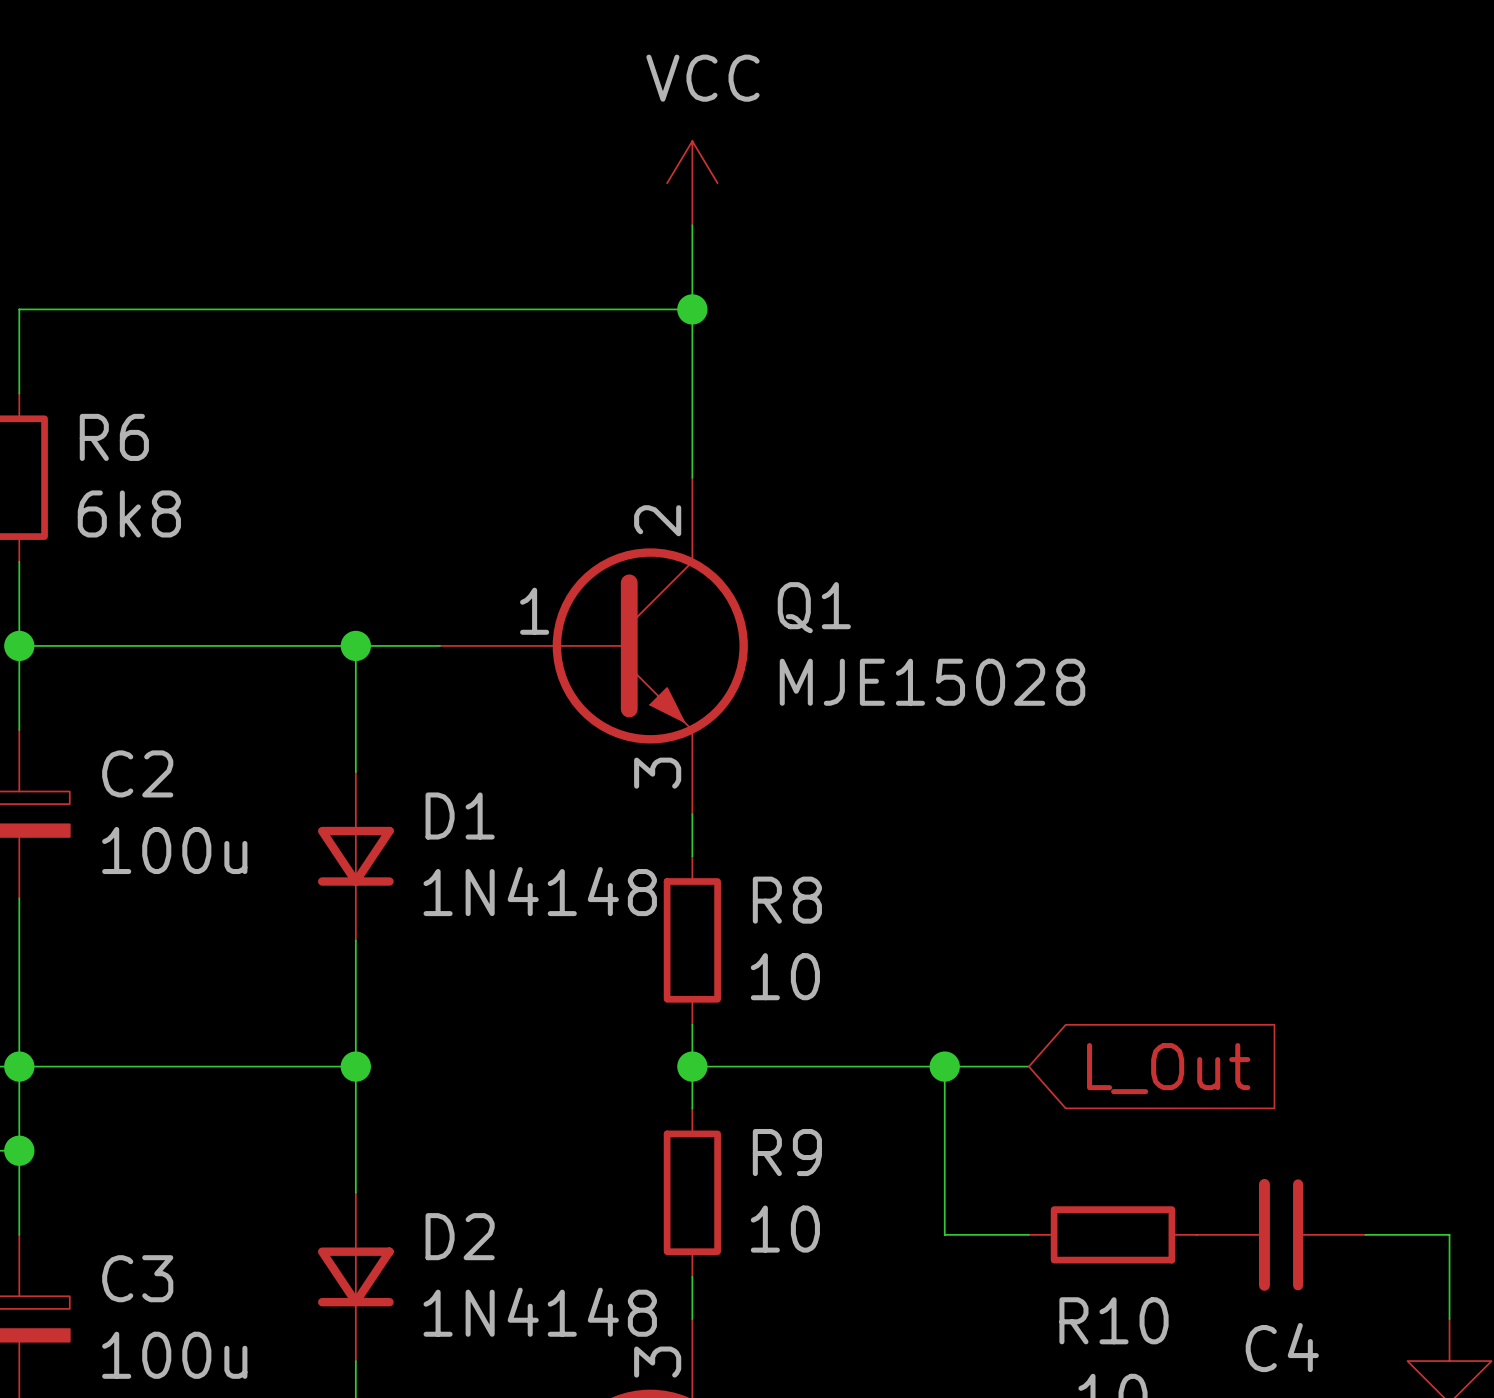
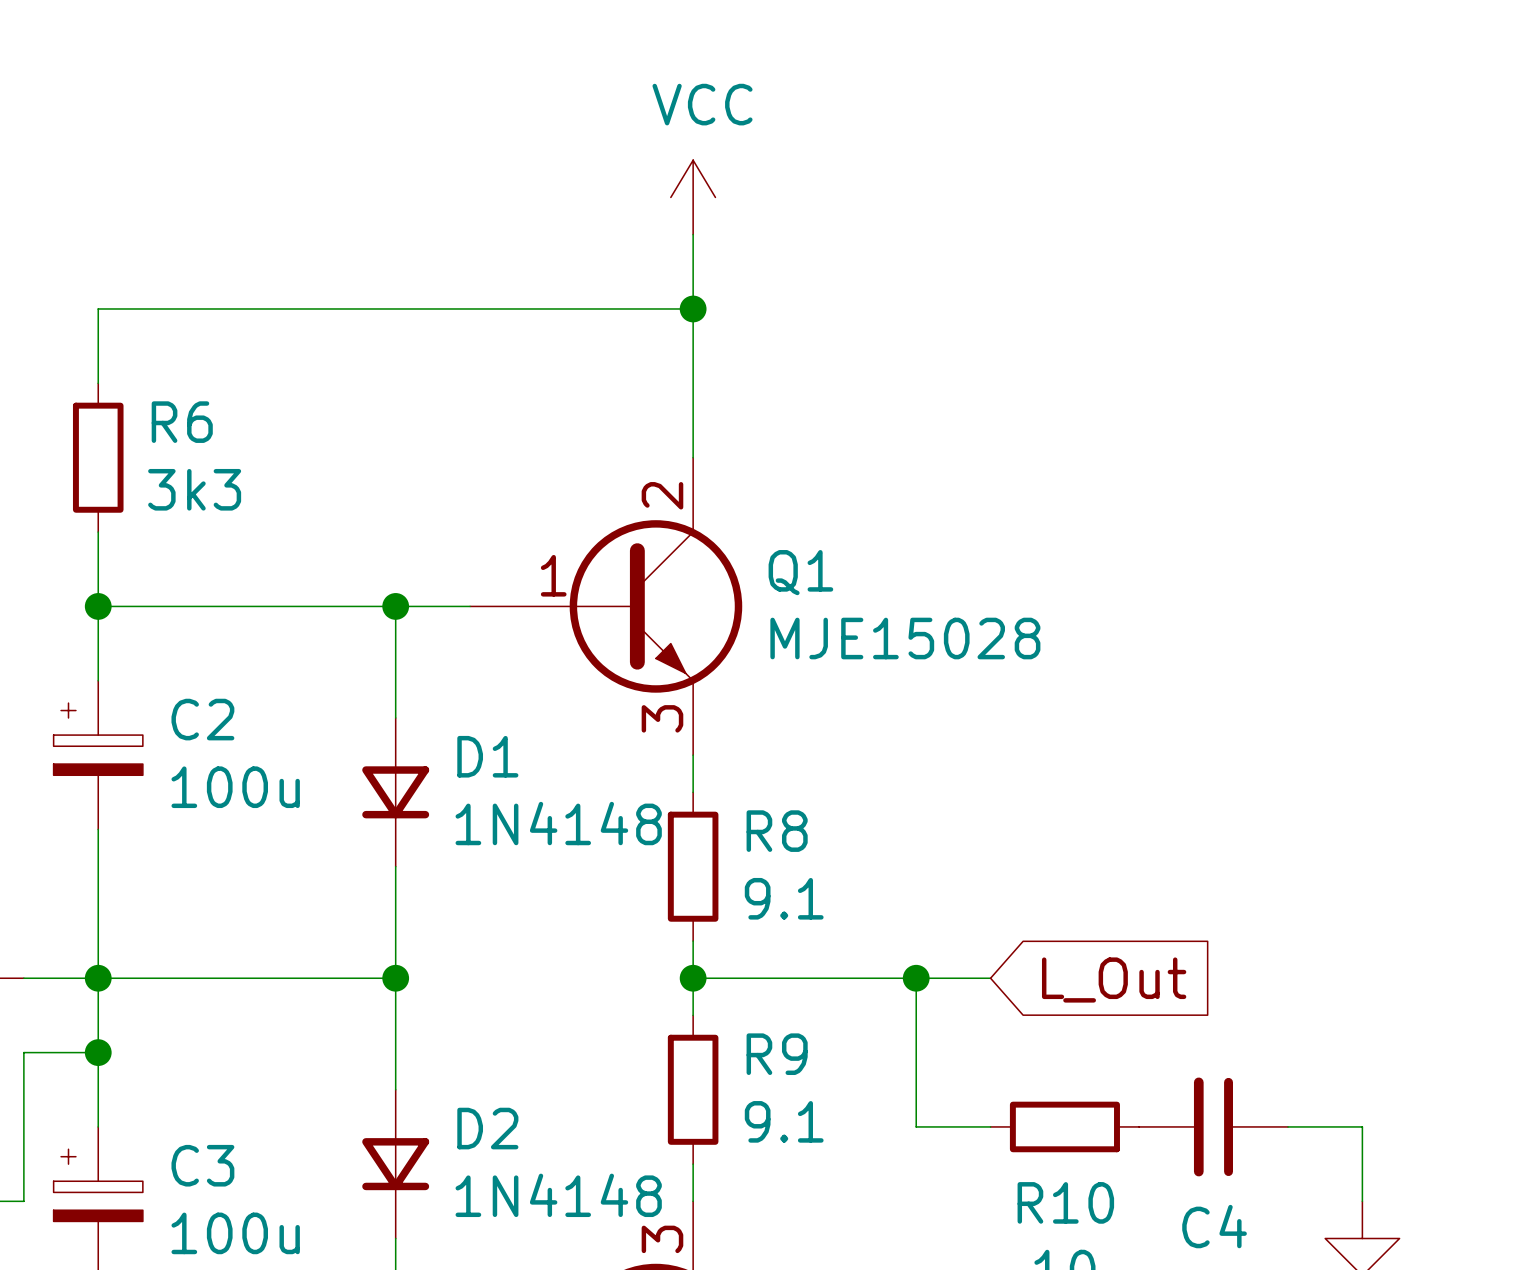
R6 value: 6k8 (129, 513) -> 3k3 (194, 489)
R8 value: 10 (785, 976) -> 9.1 (784, 898)
R9 value: 10 (785, 1229) -> 9.1 (784, 1121)

